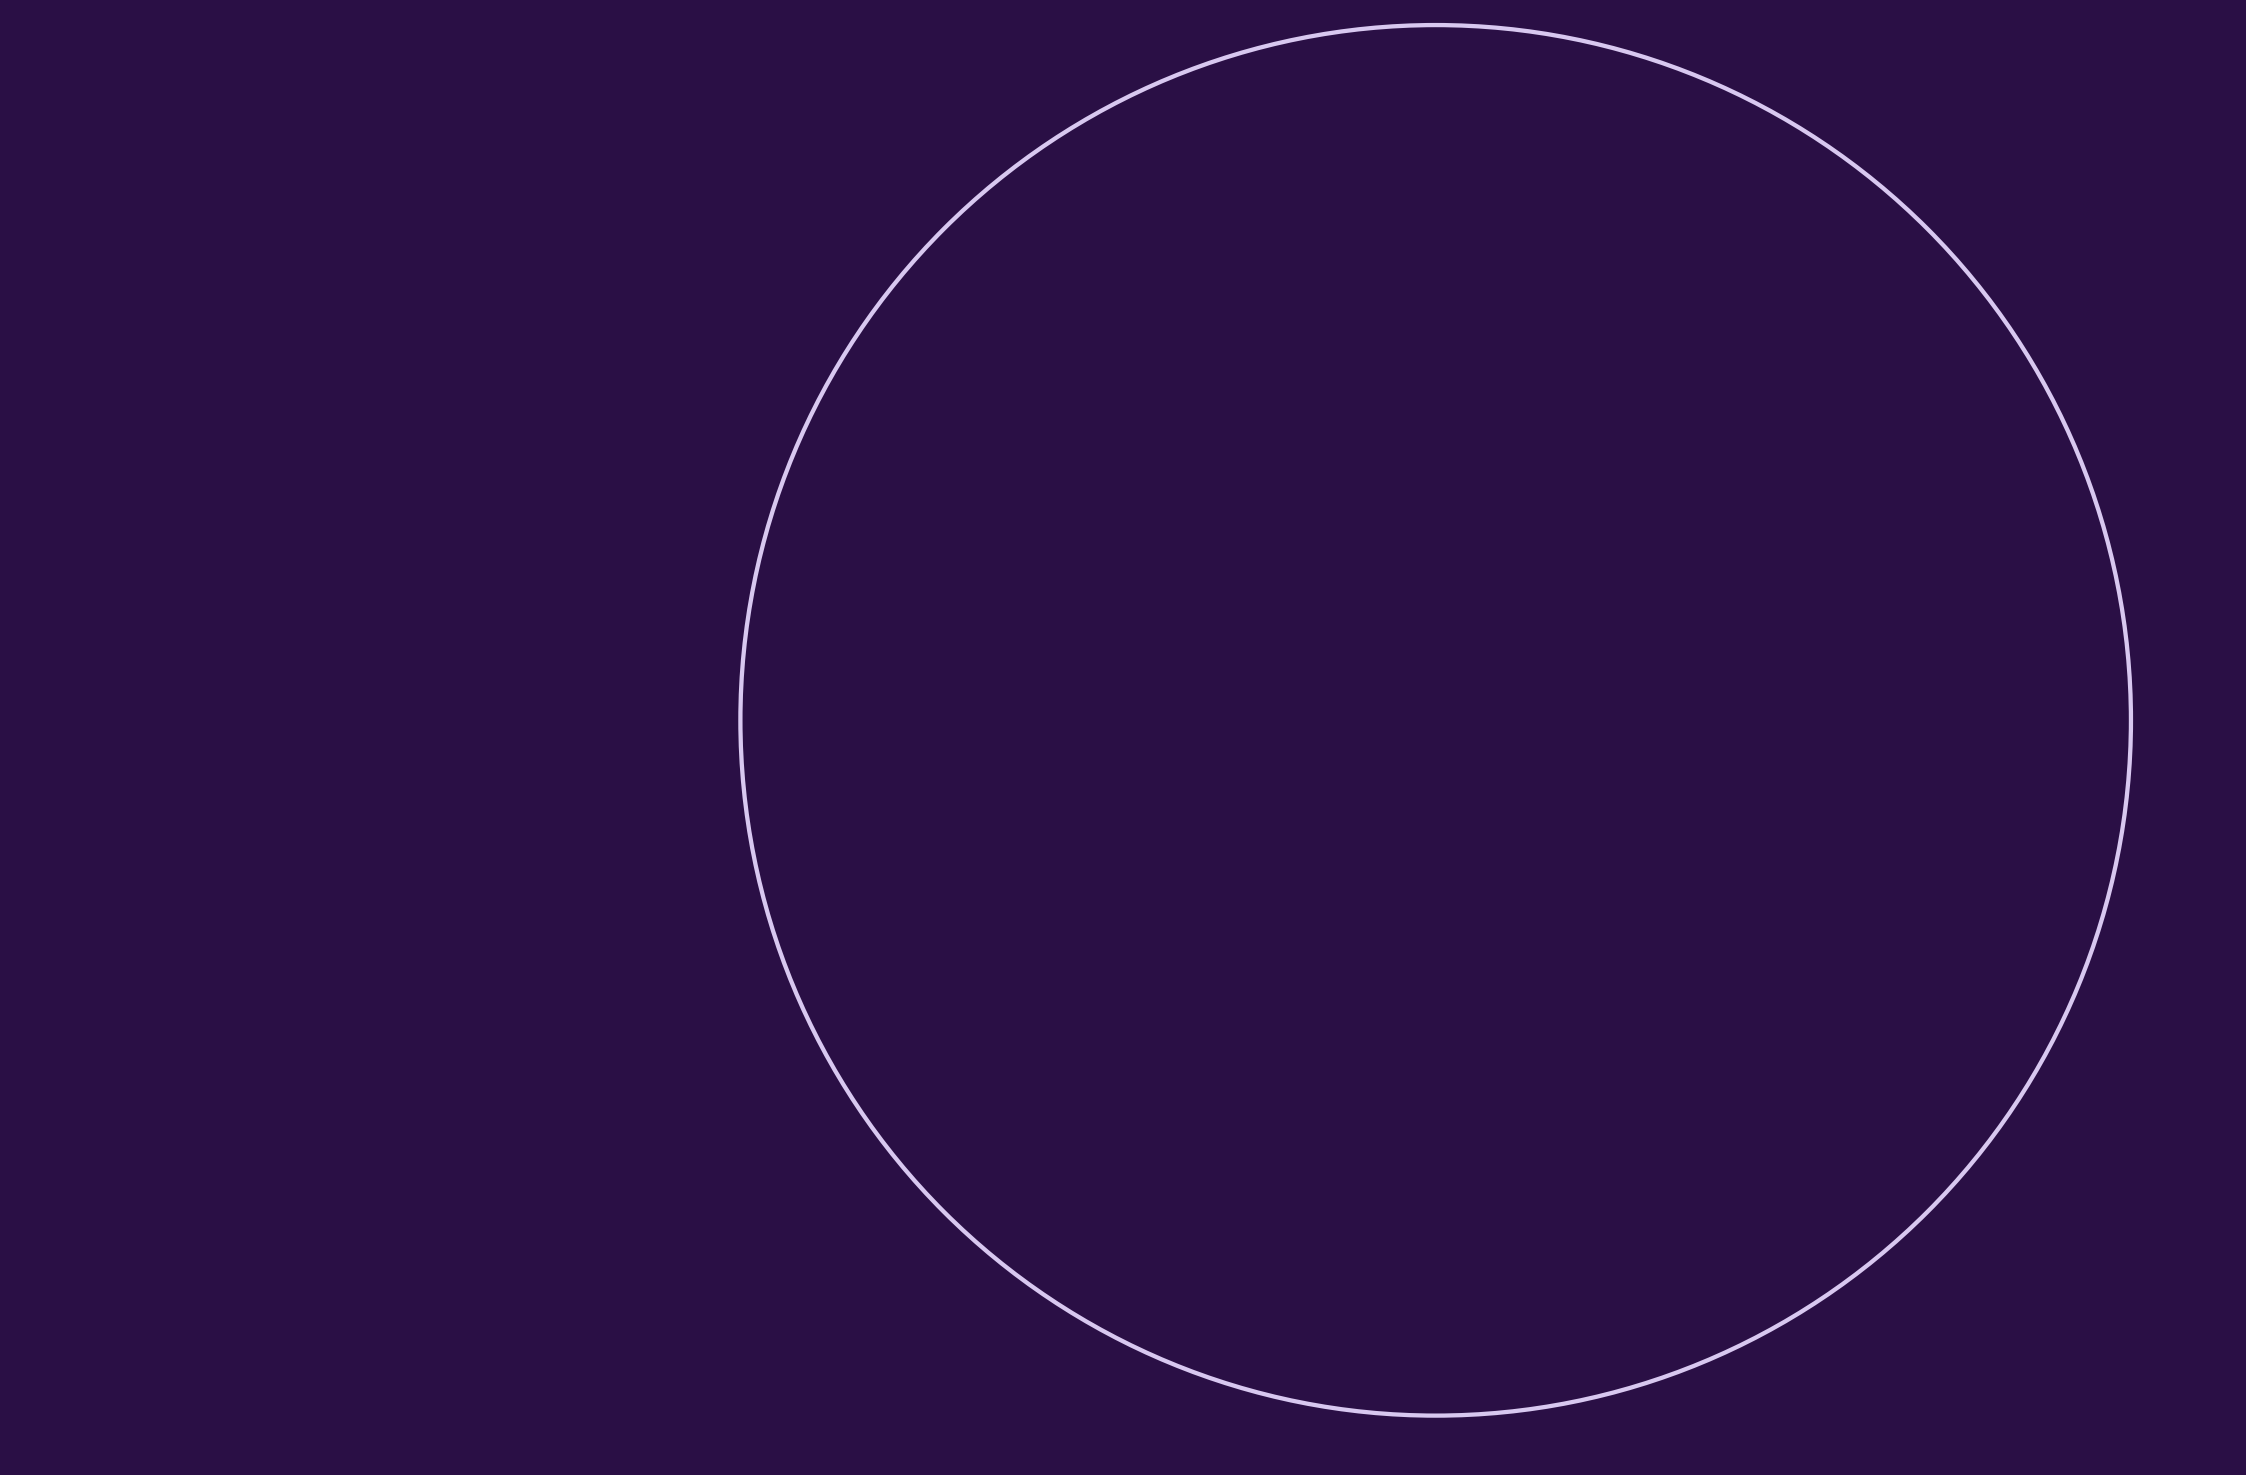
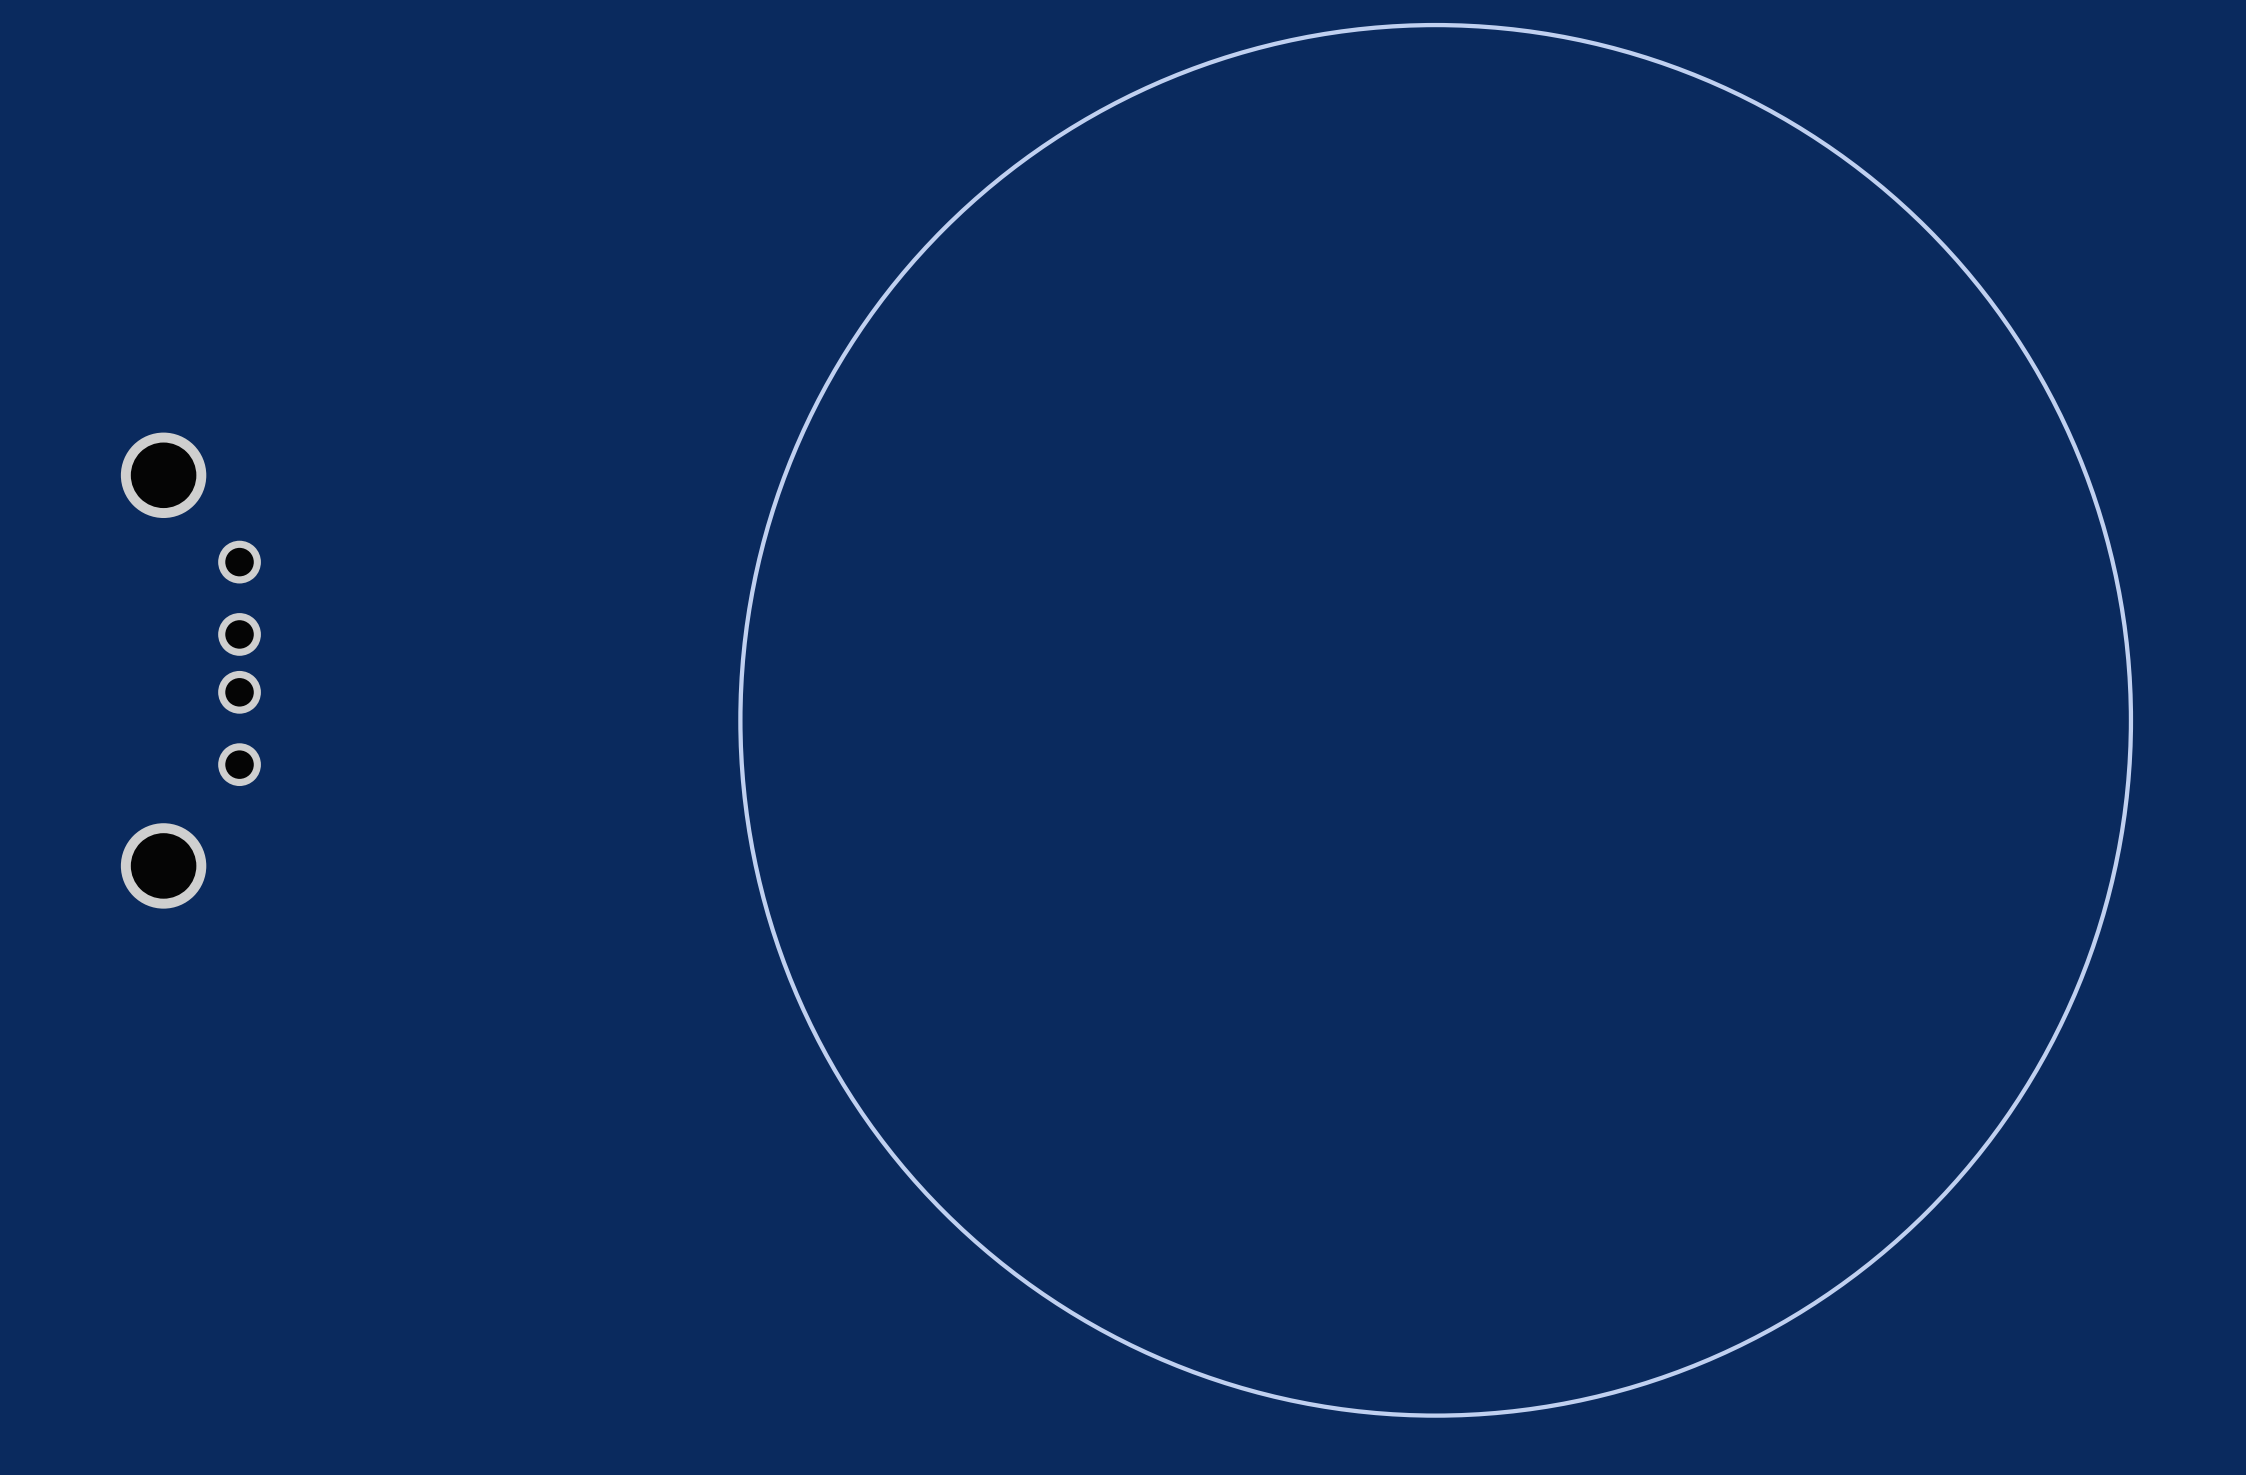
part: none -> (190, 670)

